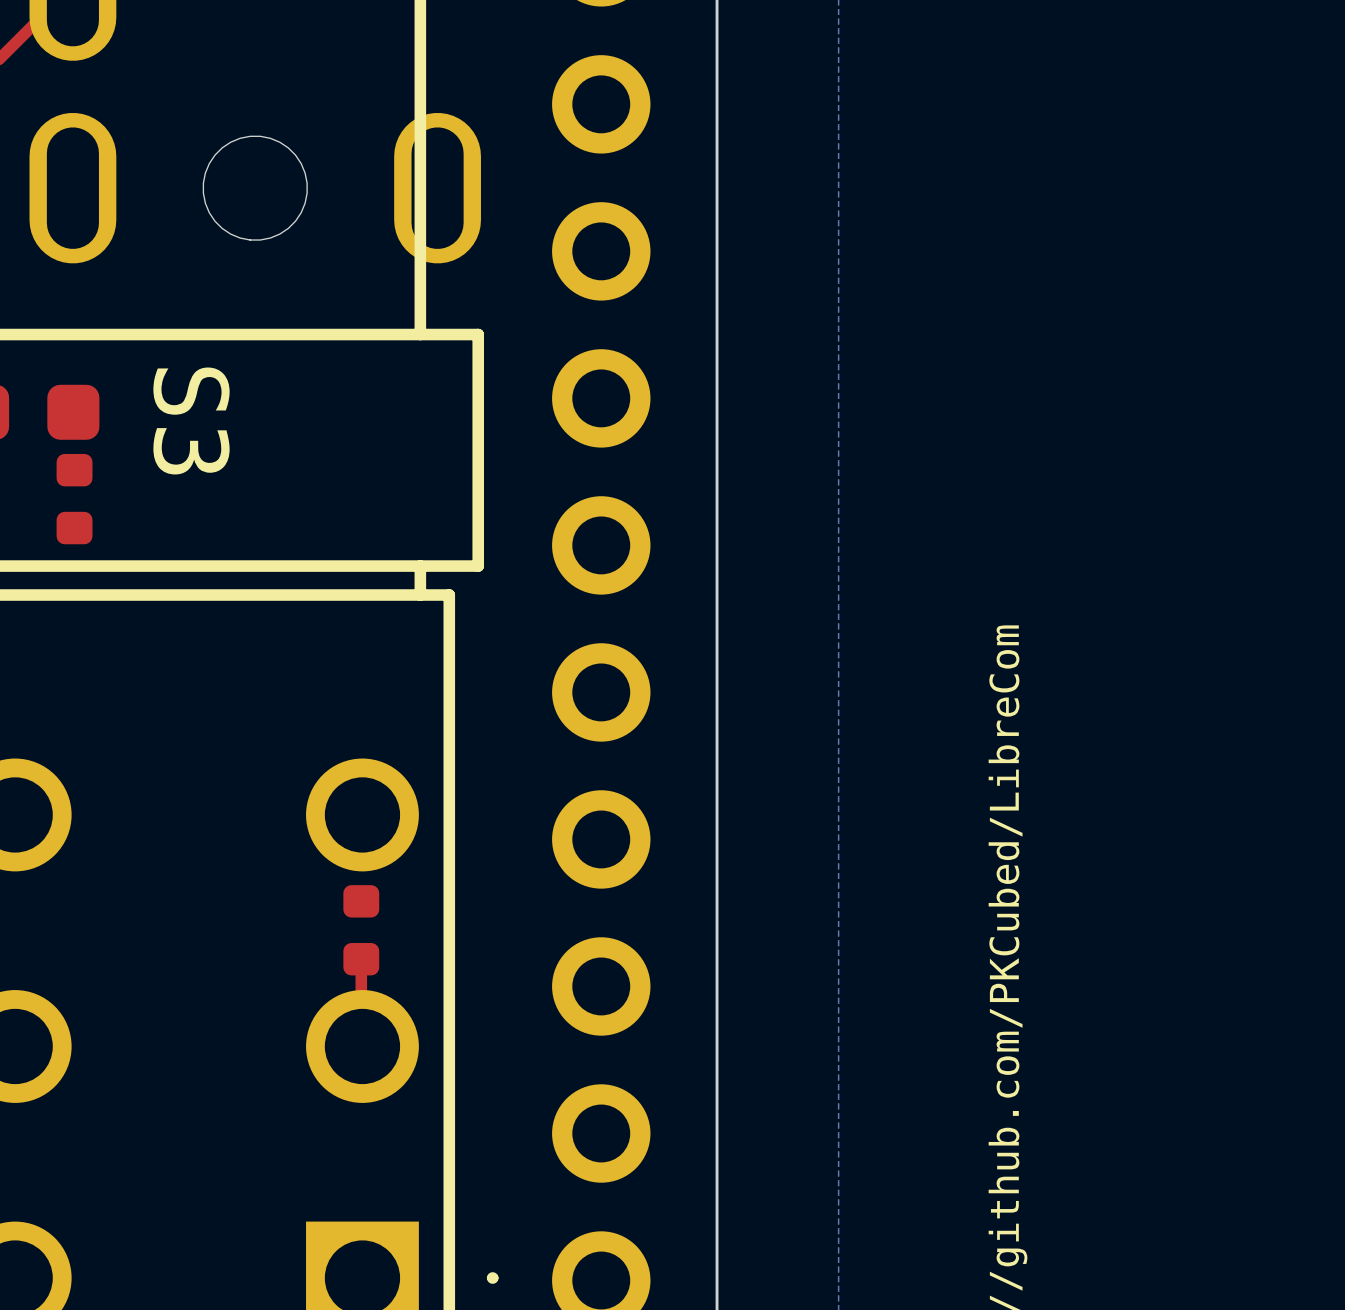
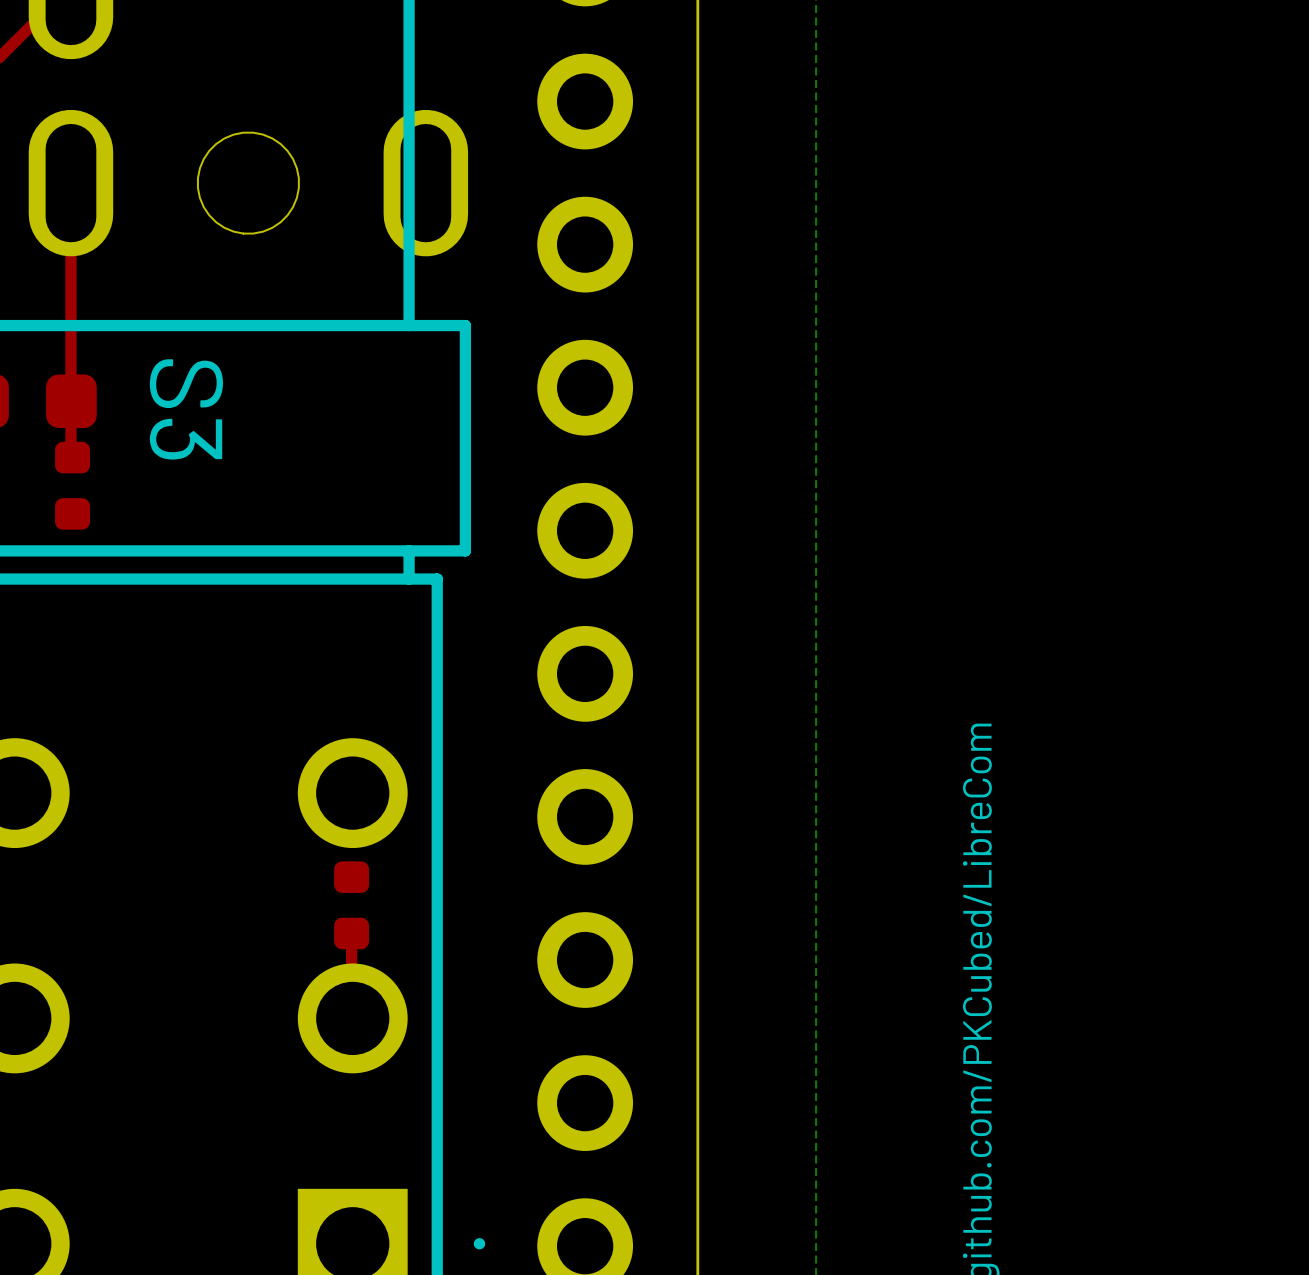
top track: none -> (70, 183) (70, 455) (72, 457)

